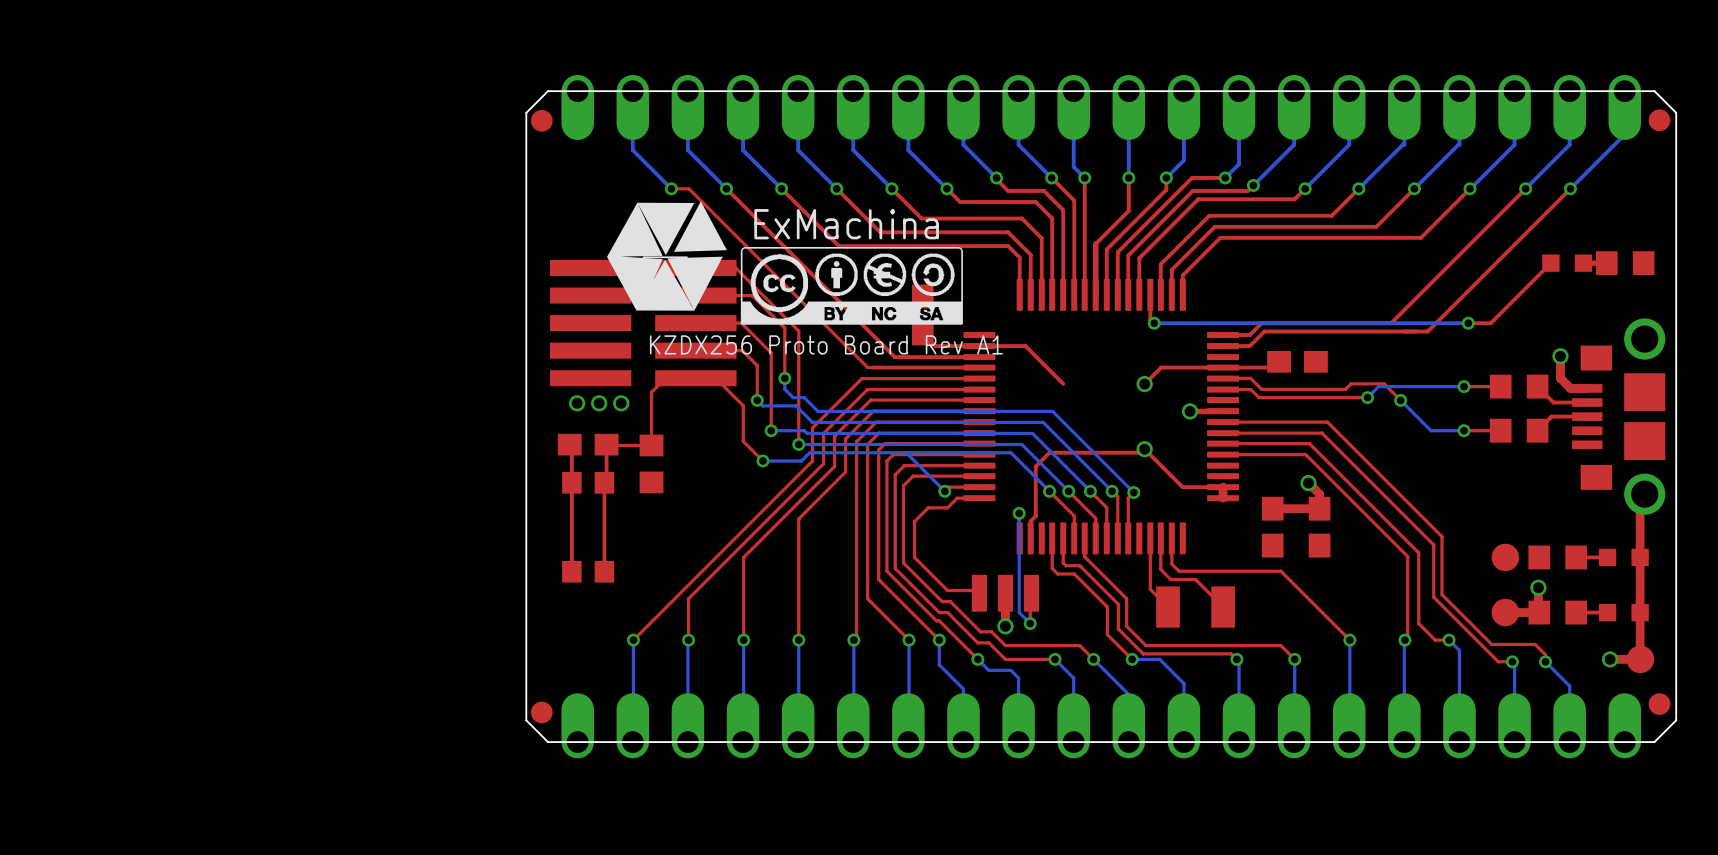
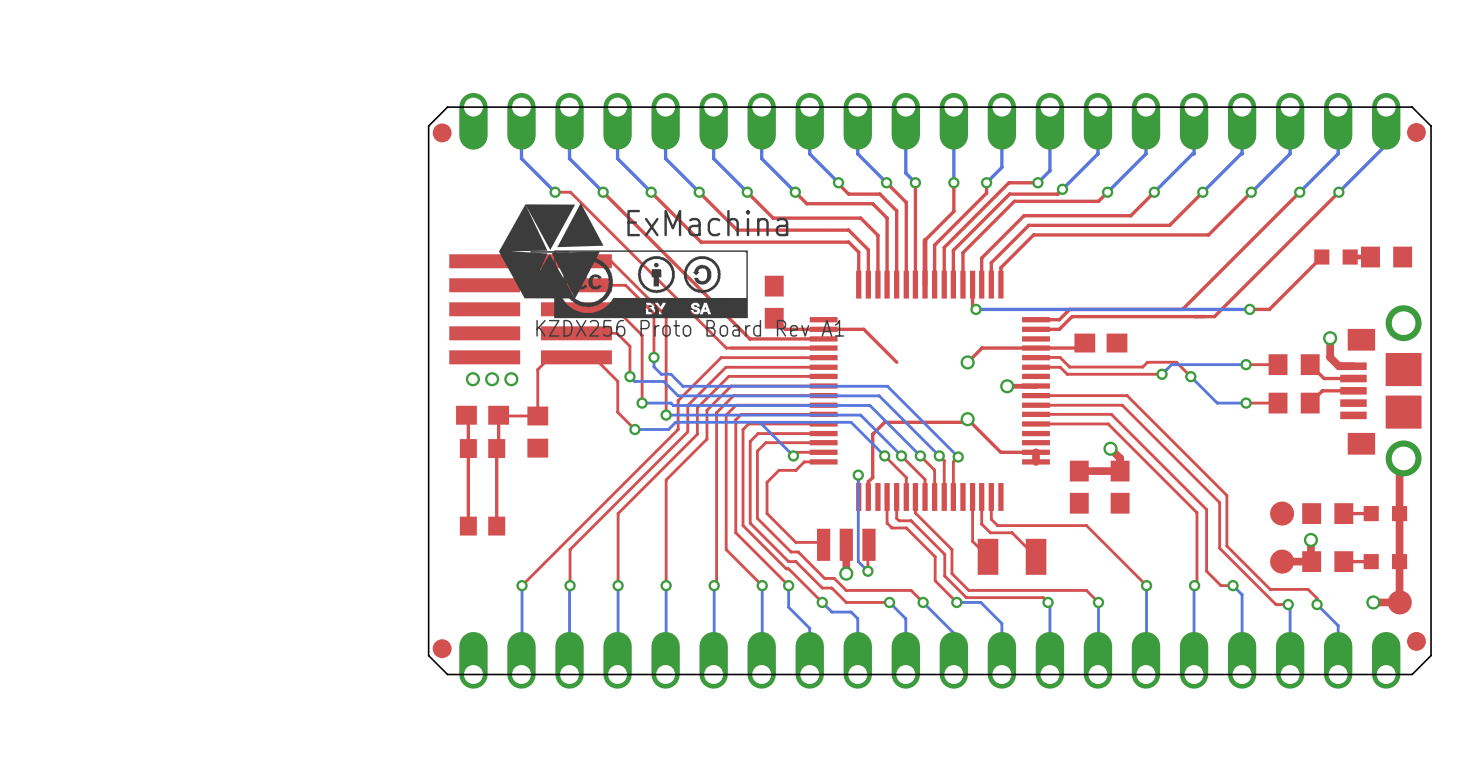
drawing: [740, 246, 963, 325] -> none
drawing: none -> [554, 250, 748, 319]

